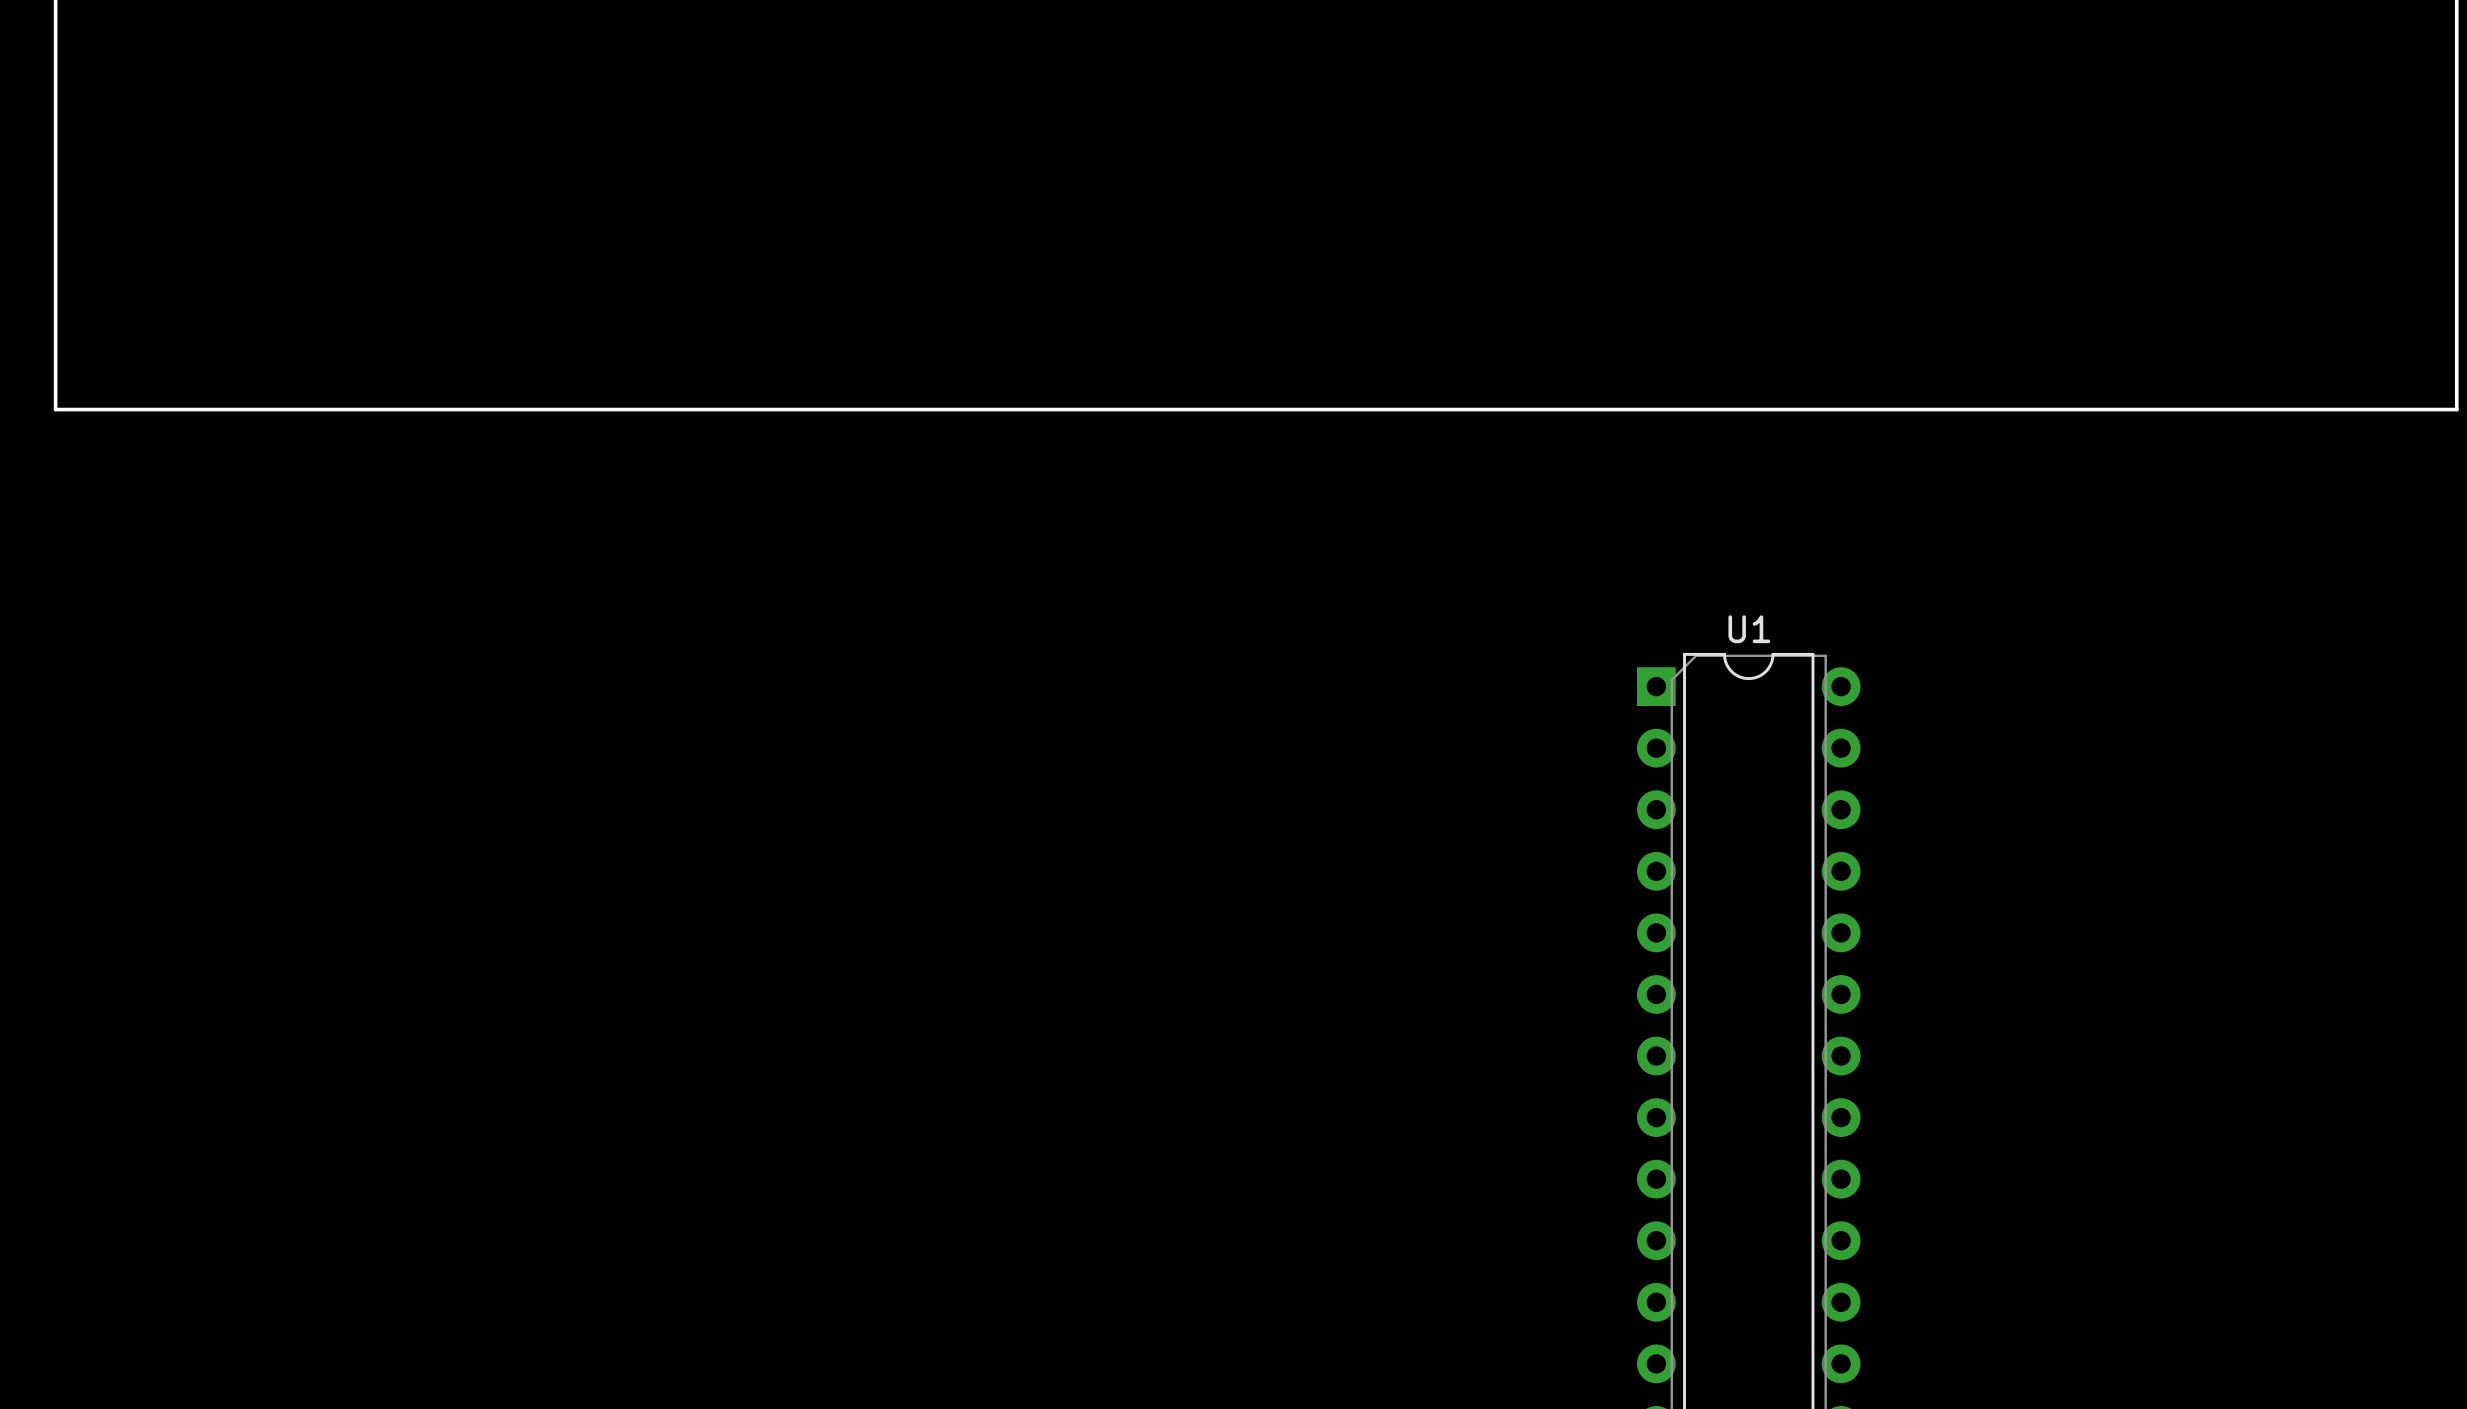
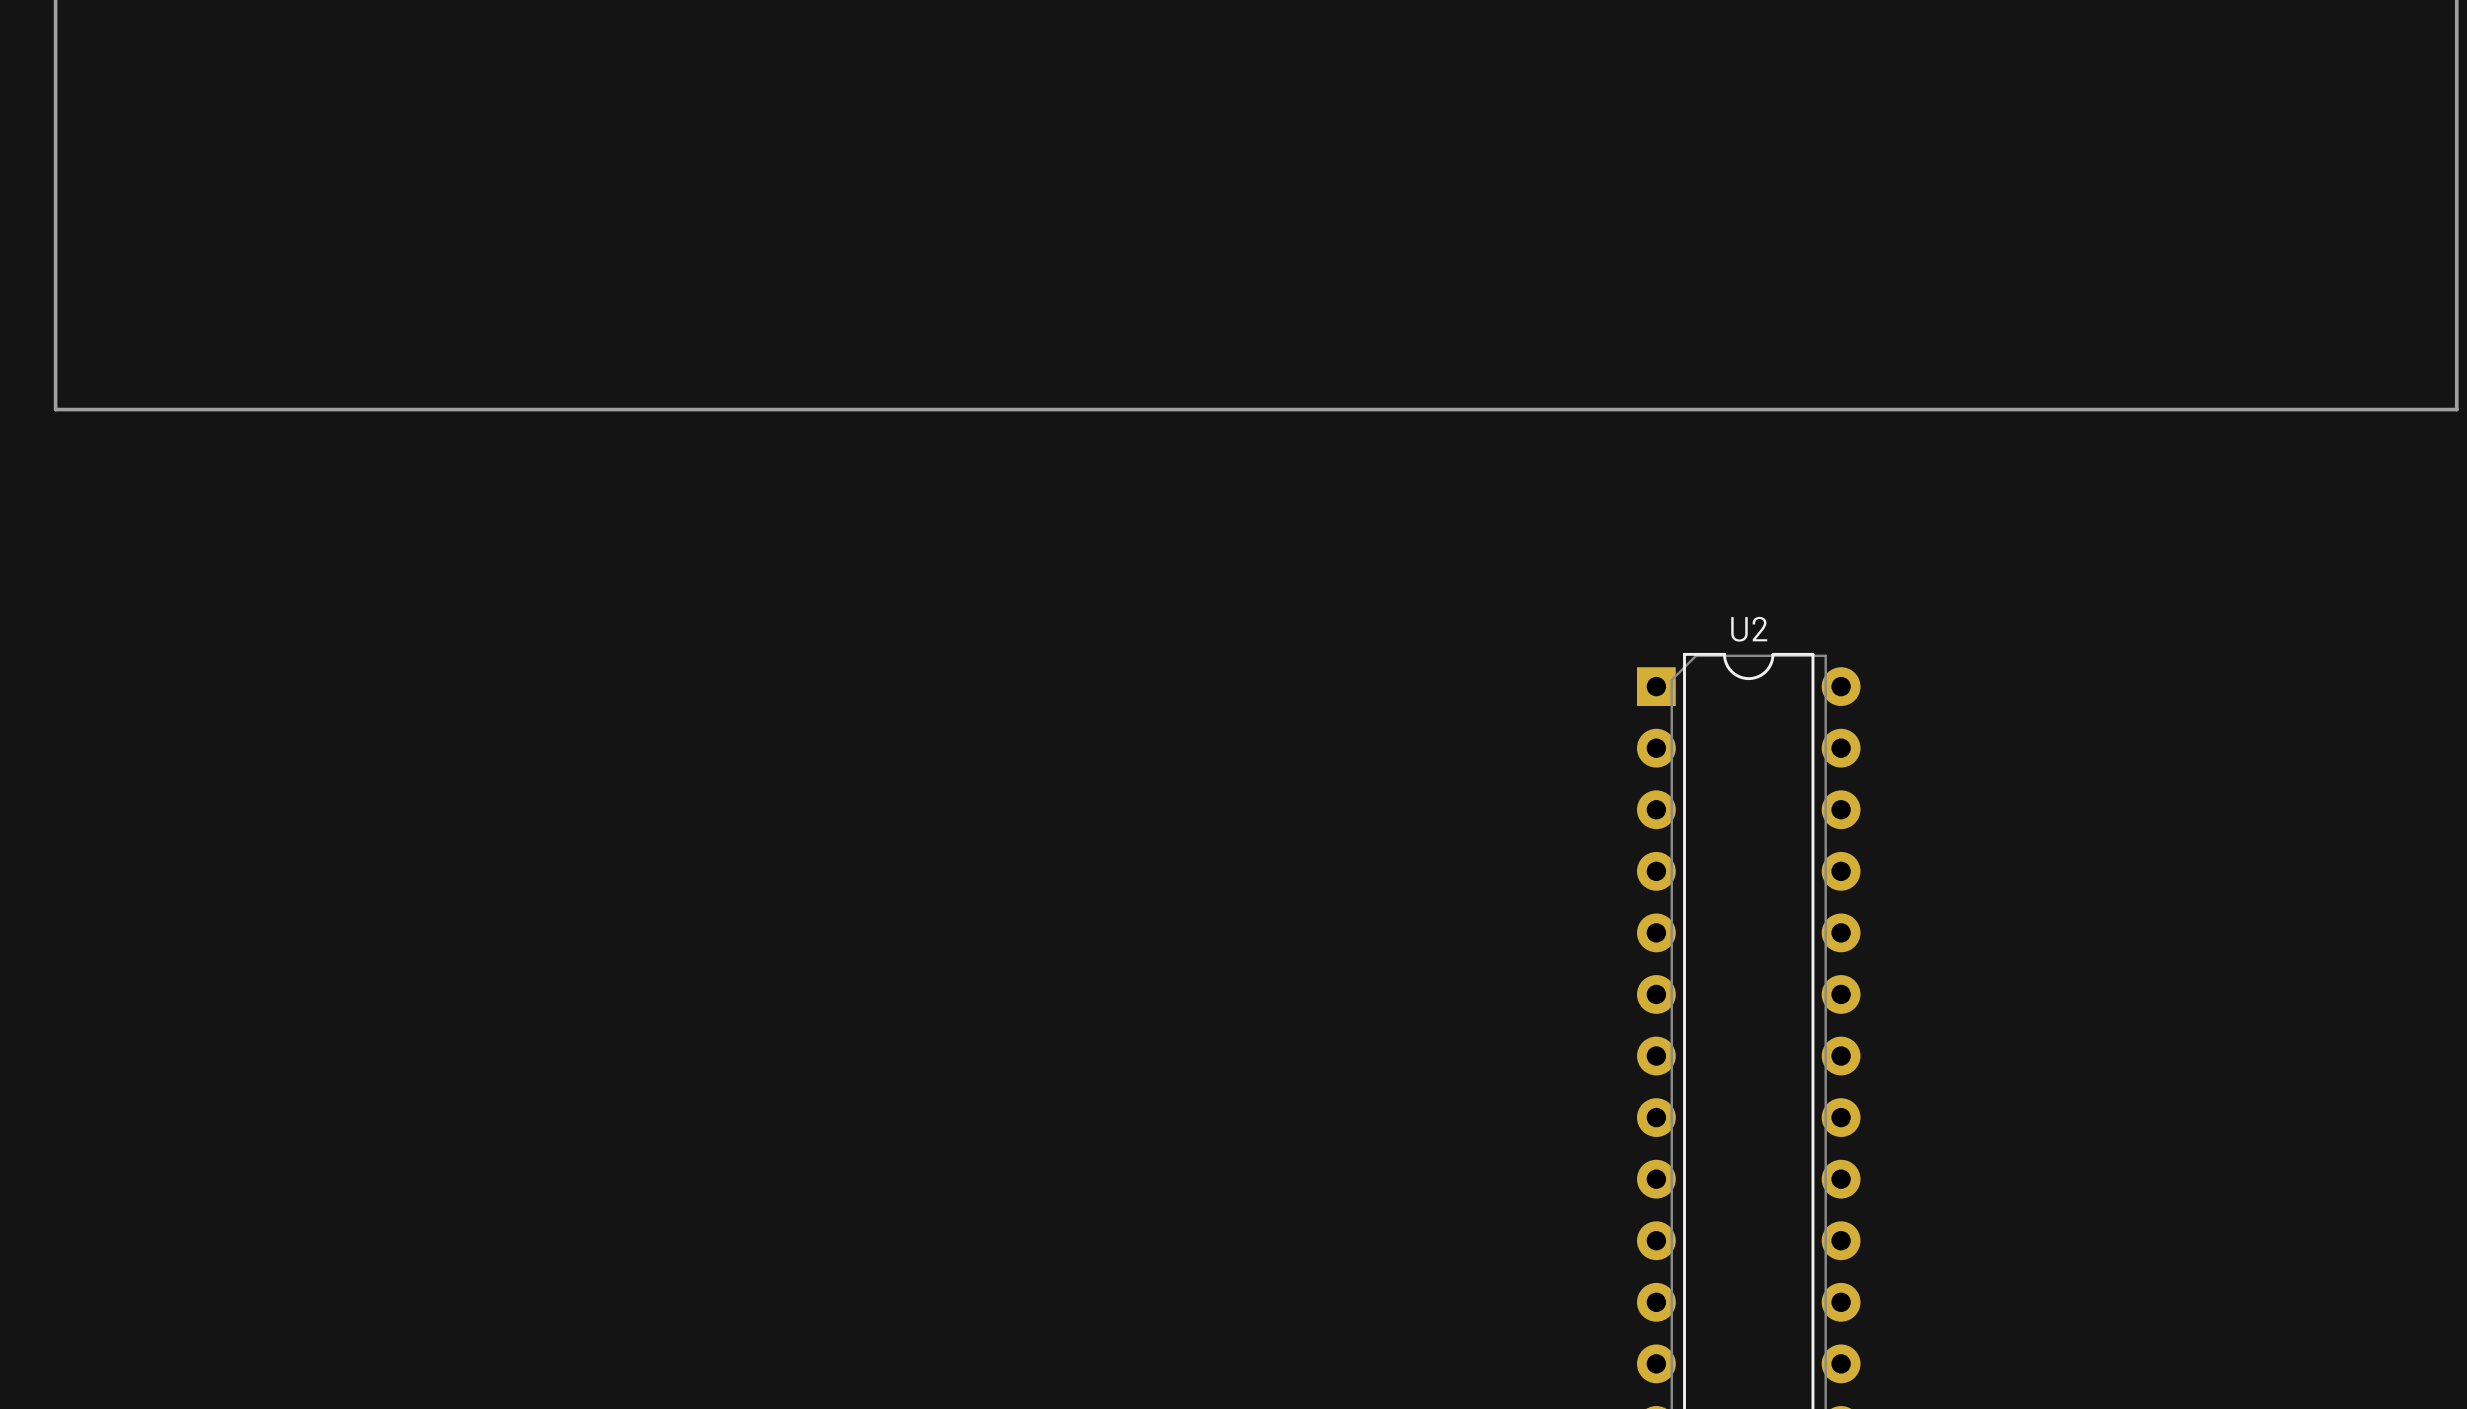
U1 name: U1 (1749, 629) -> U2 (1749, 629)

